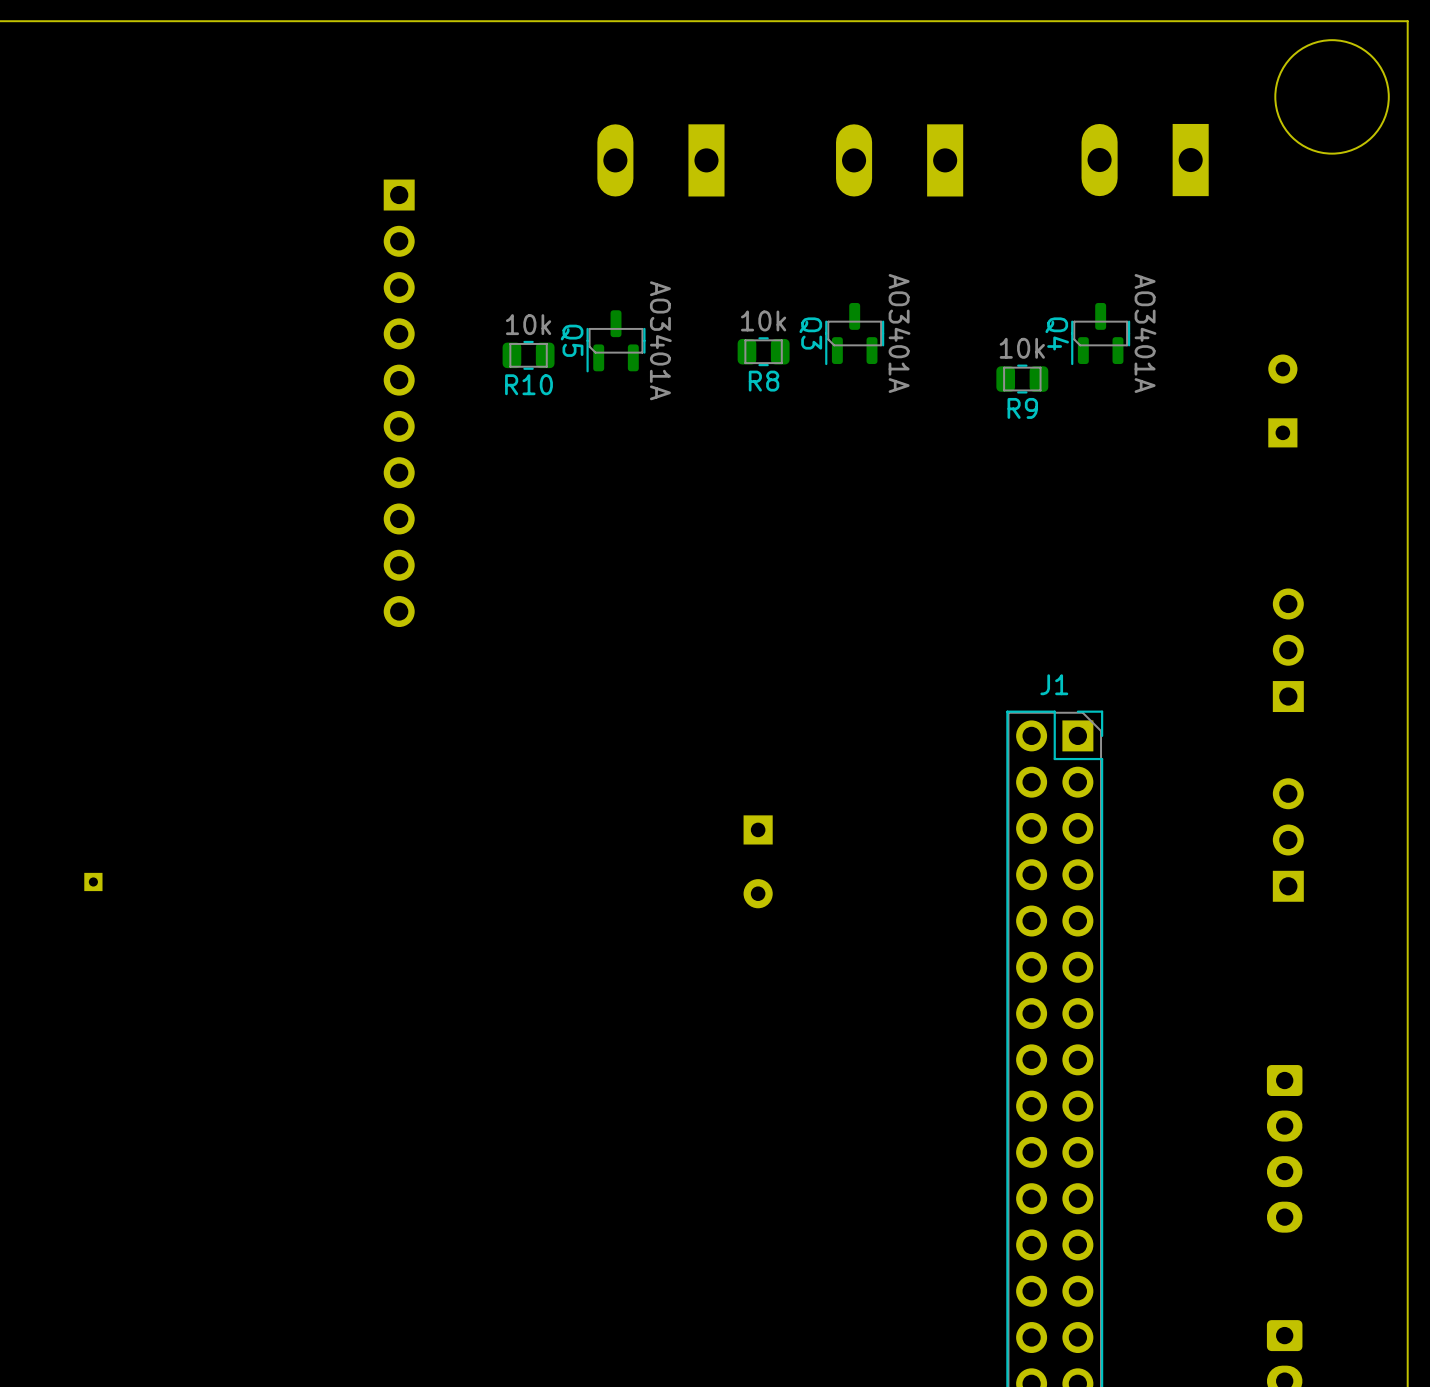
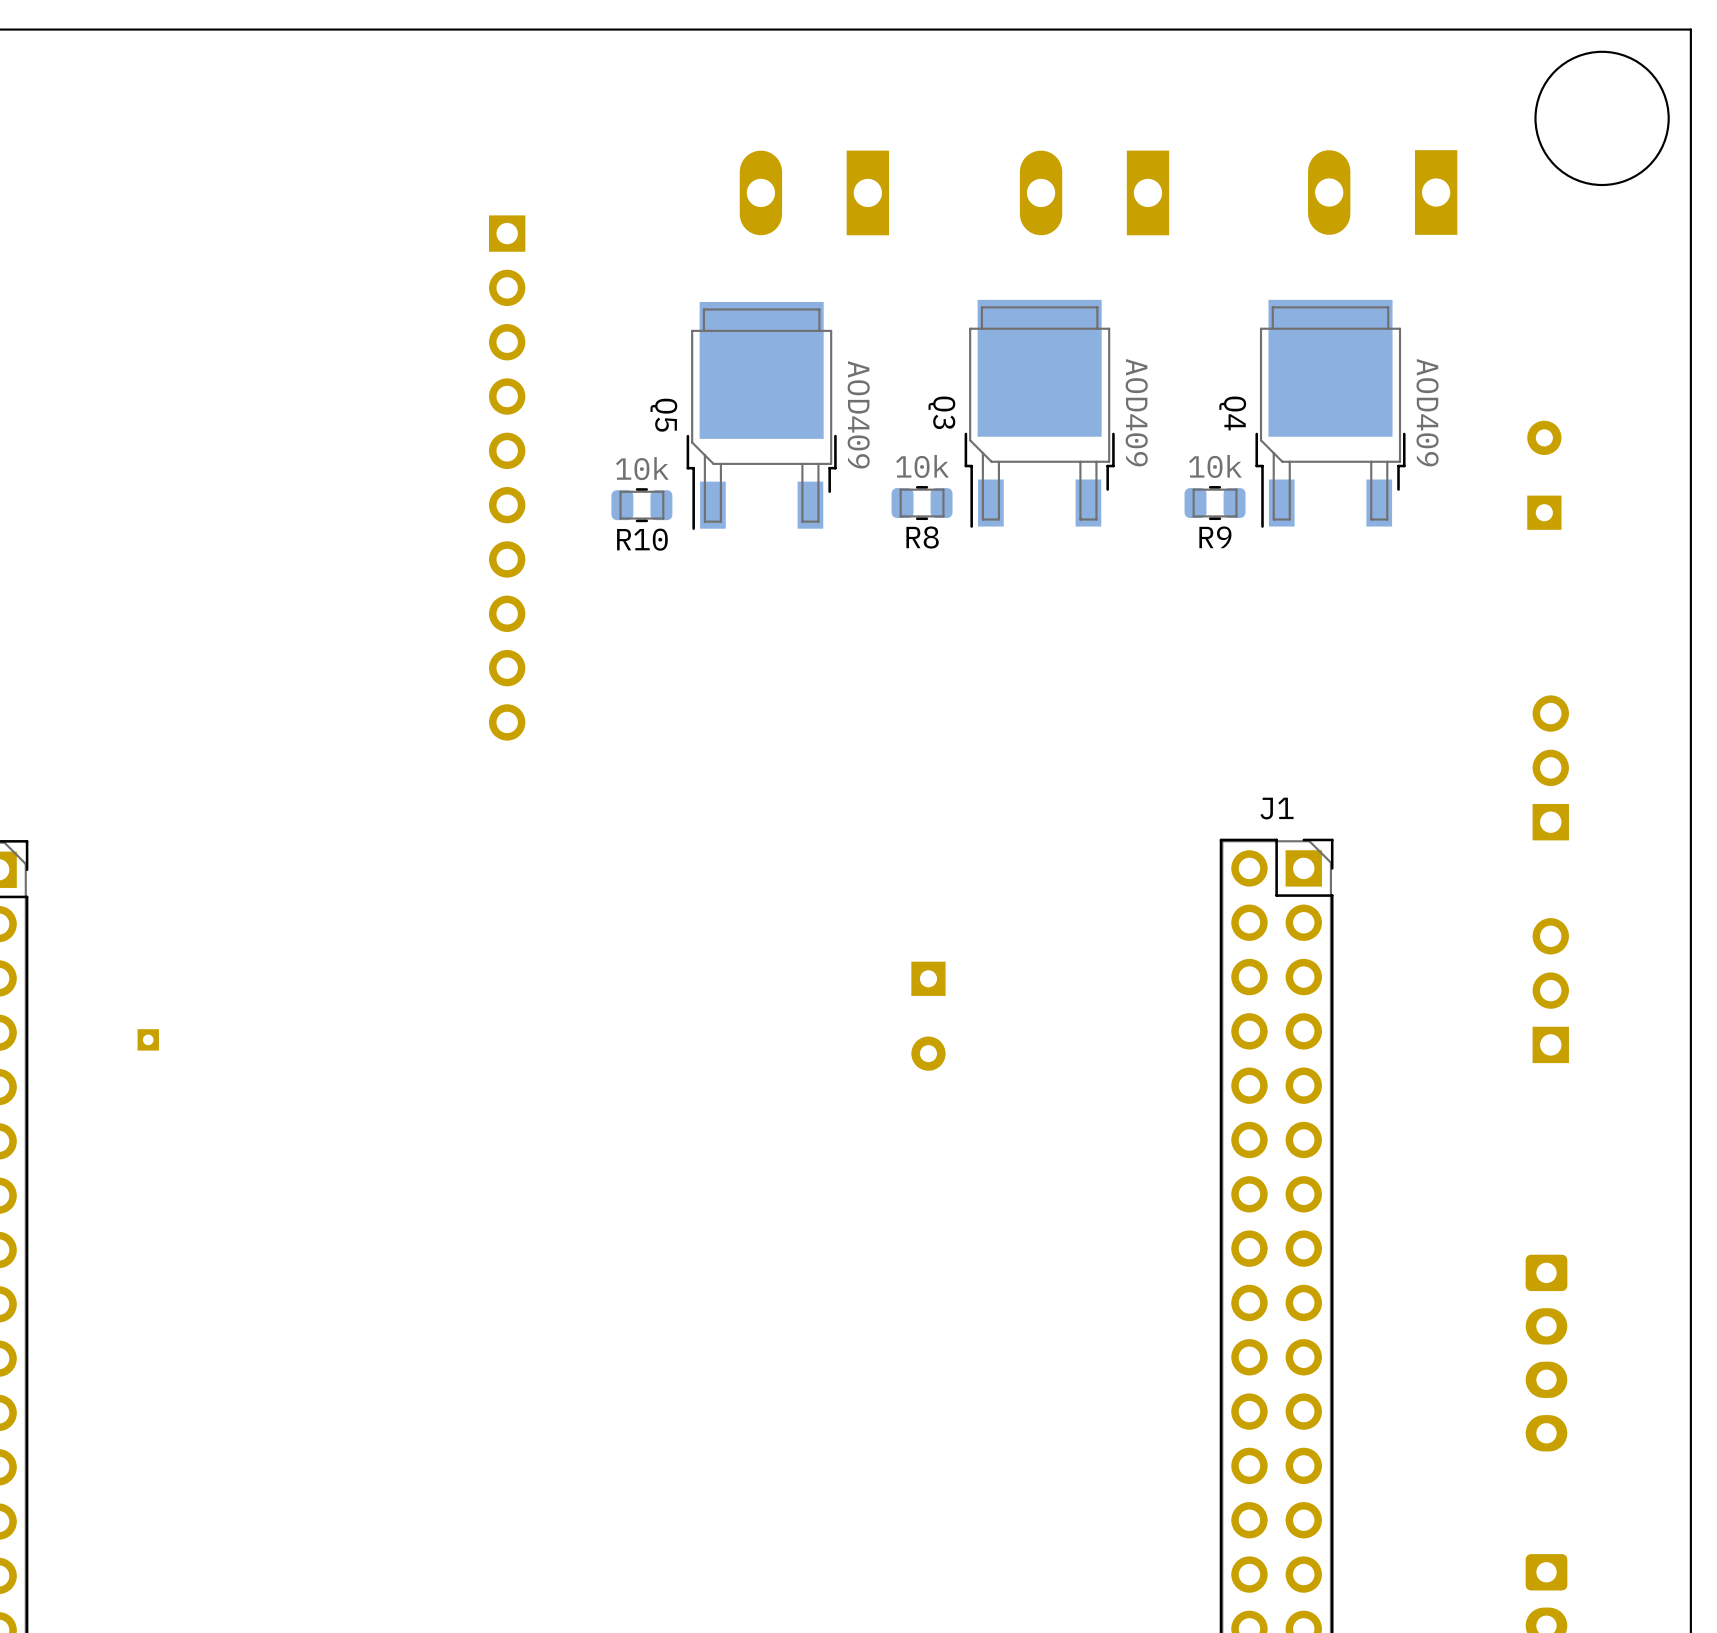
Q3 footprint: [825, 302, 885, 366] -> [964, 299, 1115, 528]
Q4 footprint: [1071, 302, 1131, 366] -> [1255, 299, 1406, 528]
Q5 footprint: [586, 310, 646, 373] -> [686, 302, 837, 530]
Q3 name position: Q3 (810, 333) -> Q3 (941, 412)
Q3 value: AO3401A (899, 333) -> AOD409 (1136, 412)
Q4 name position: Q4 (1057, 333) -> Q4 (1232, 413)
Q4 value: AO3401A (1145, 333) -> AOD409 (1427, 412)
Q5 name position: Q5 (572, 340) -> Q5 (663, 415)
Q5 value: AO3401A (660, 340) -> AOD409 (858, 414)
R8 position: (763, 351) -> (922, 503)
R10 position: (528, 355) -> (641, 505)
R9 position: (1022, 379) -> (1215, 503)

